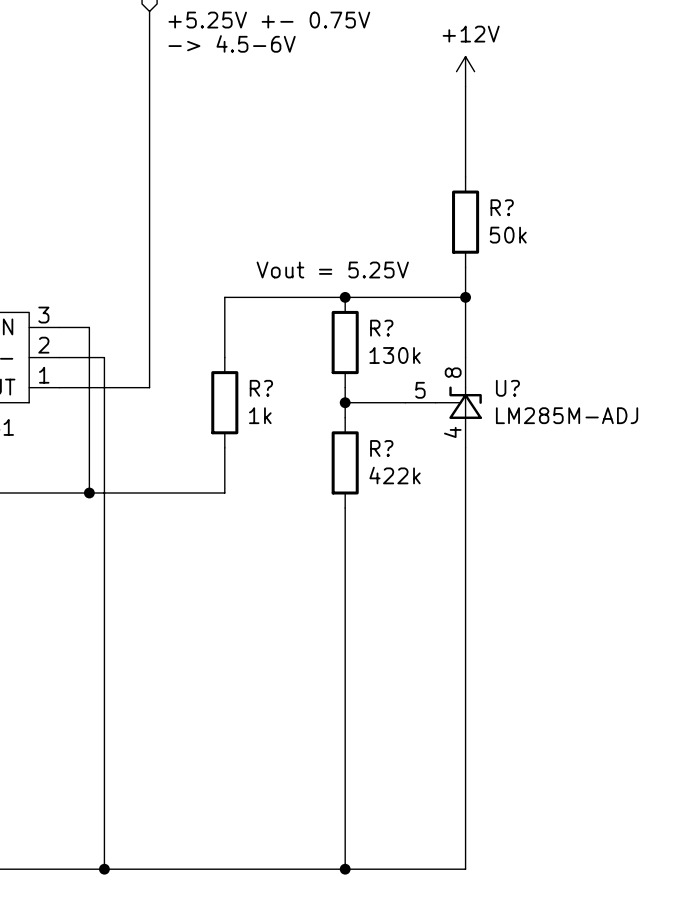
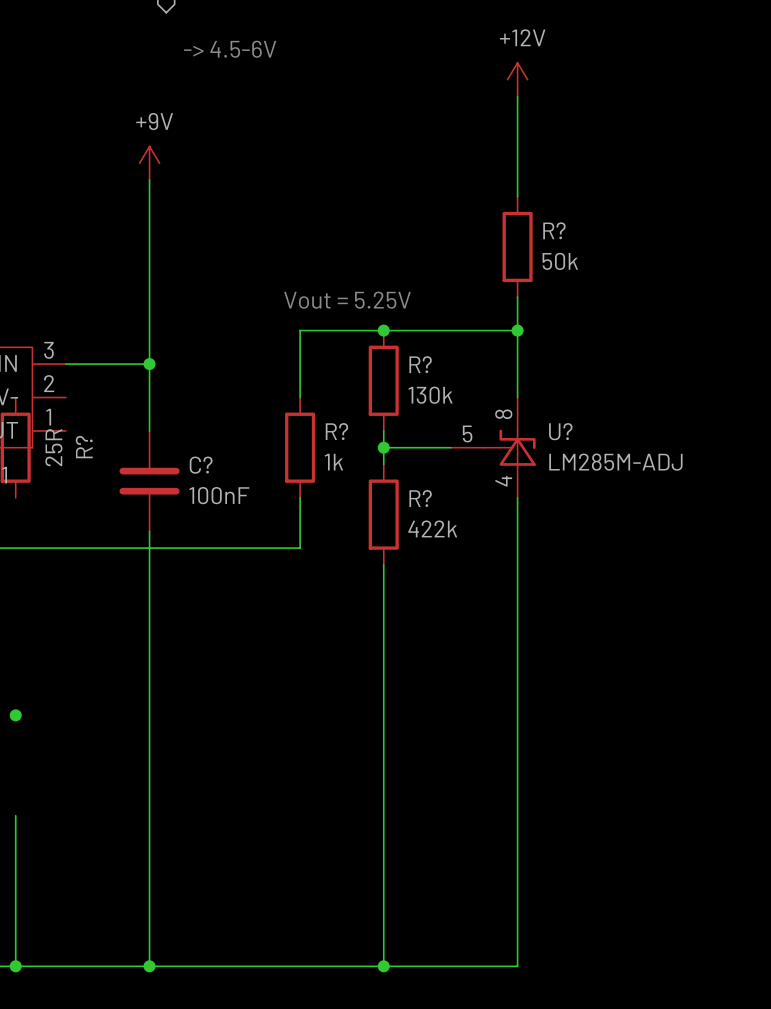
wire: (149, 11) (149, 387) (59, 387) -> none
text: +5.25V +- 0.75V (269, 20) -> none
power symbol: none -> +9V (149, 163)
wire: none -> (149, 180) (149, 430)
wire: (269, 297) (224, 297) (224, 357) -> (300, 330) (300, 397)
wire: (89, 327) (89, 493) -> (99, 364) (149, 364)
junction: none -> (149, 364)
wire: (59, 357) (104, 357) (104, 869) -> none
R?: none -> 25R (15, 447)
R? position: (224, 402) -> (300, 447)
C?: none -> 100nF (149, 481)
wire: (224, 447) (224, 493) -> (300, 497) (300, 548) (249, 548)
wire: none -> (149, 531) (149, 966)
junction: (89, 493) -> none
junction: none -> (15, 715)
wire: none -> (15, 815) (15, 966)
junction: none -> (15, 966)
junction position: (104, 869) -> (149, 966)

